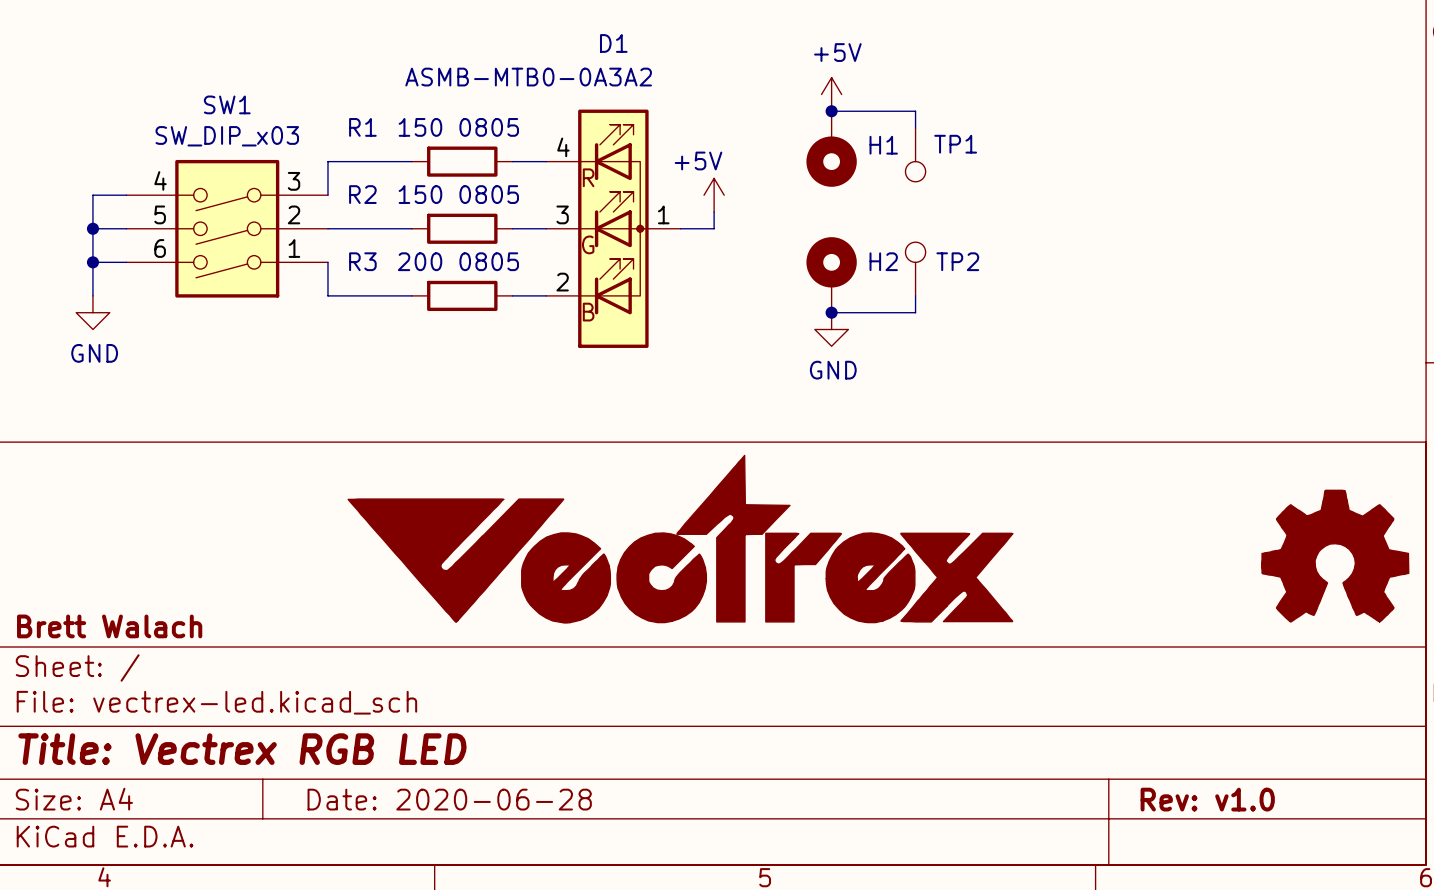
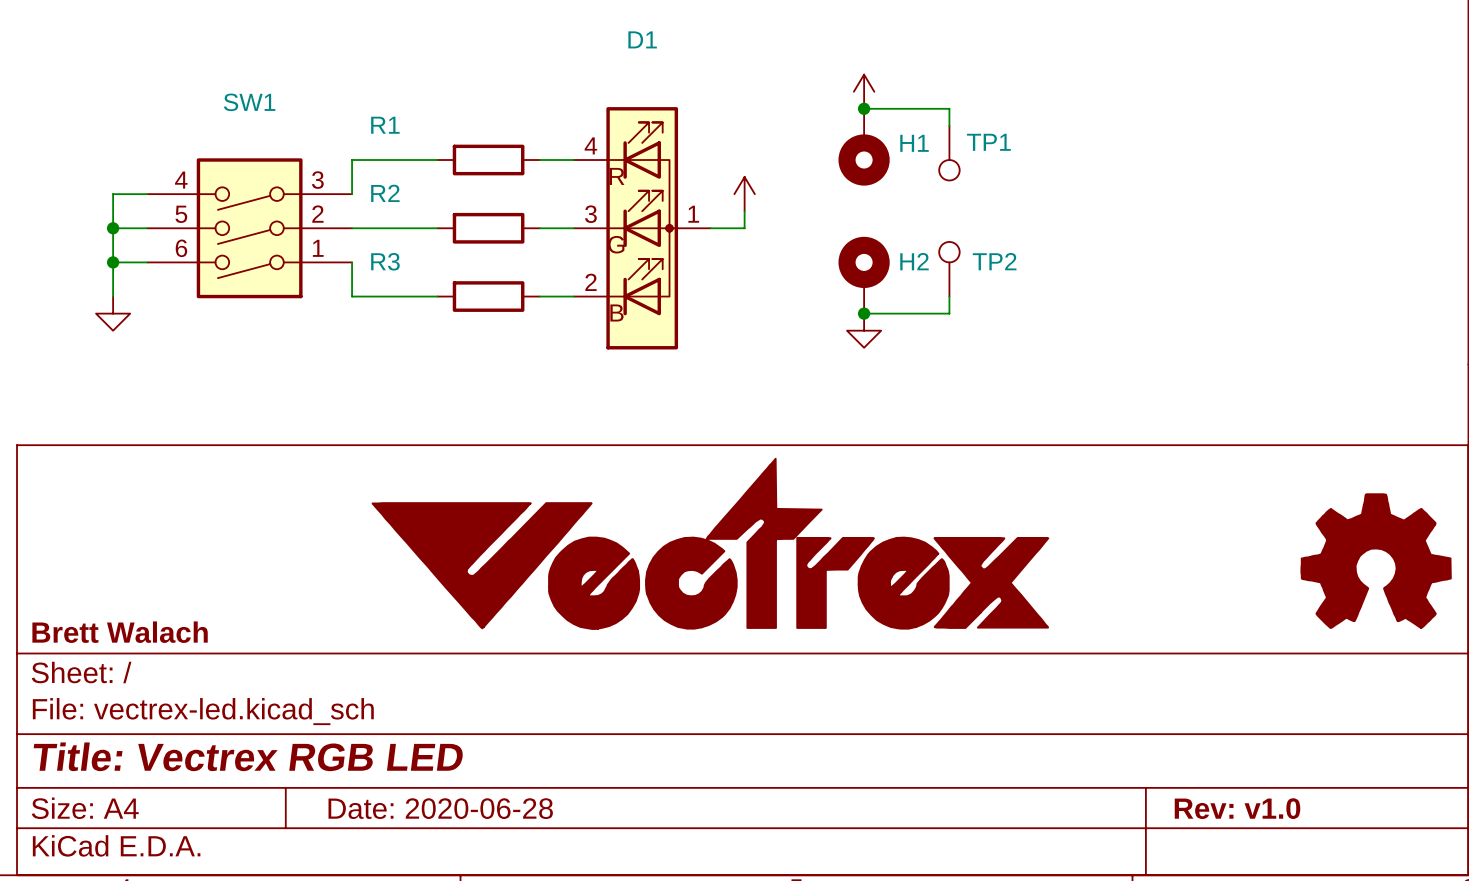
power symbol text: +5V (837, 52) -> none
D1 value: ASMB-MTB0-0A3A2 (528, 77) -> none
R1 value: 150 0805 (458, 127) -> none
SW1 value: SW_DIP_x03 (227, 136) -> none
power symbol text: +5V (698, 160) -> none
R2 value: 150 0805 (458, 194) -> none
R3 value: 200 0805 (458, 261) -> none
power symbol text: GND (94, 353) -> none
power symbol text: GND (833, 370) -> none

